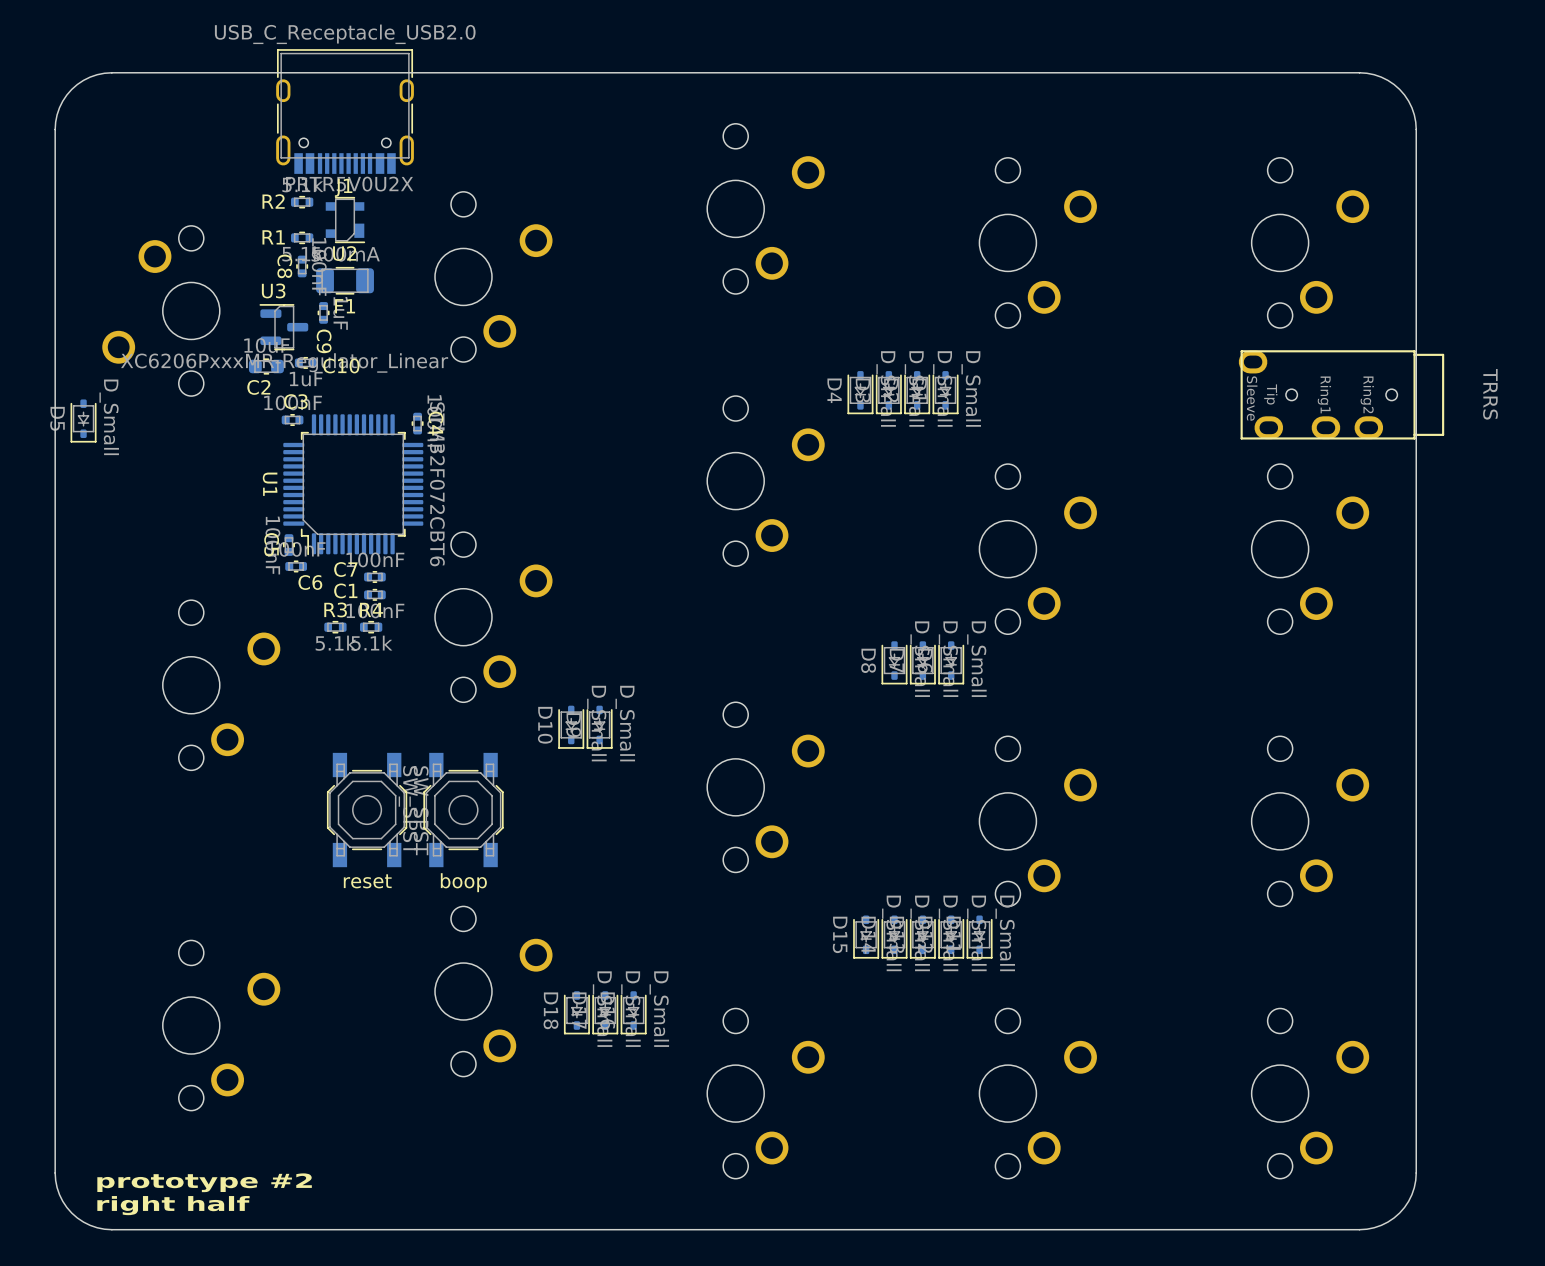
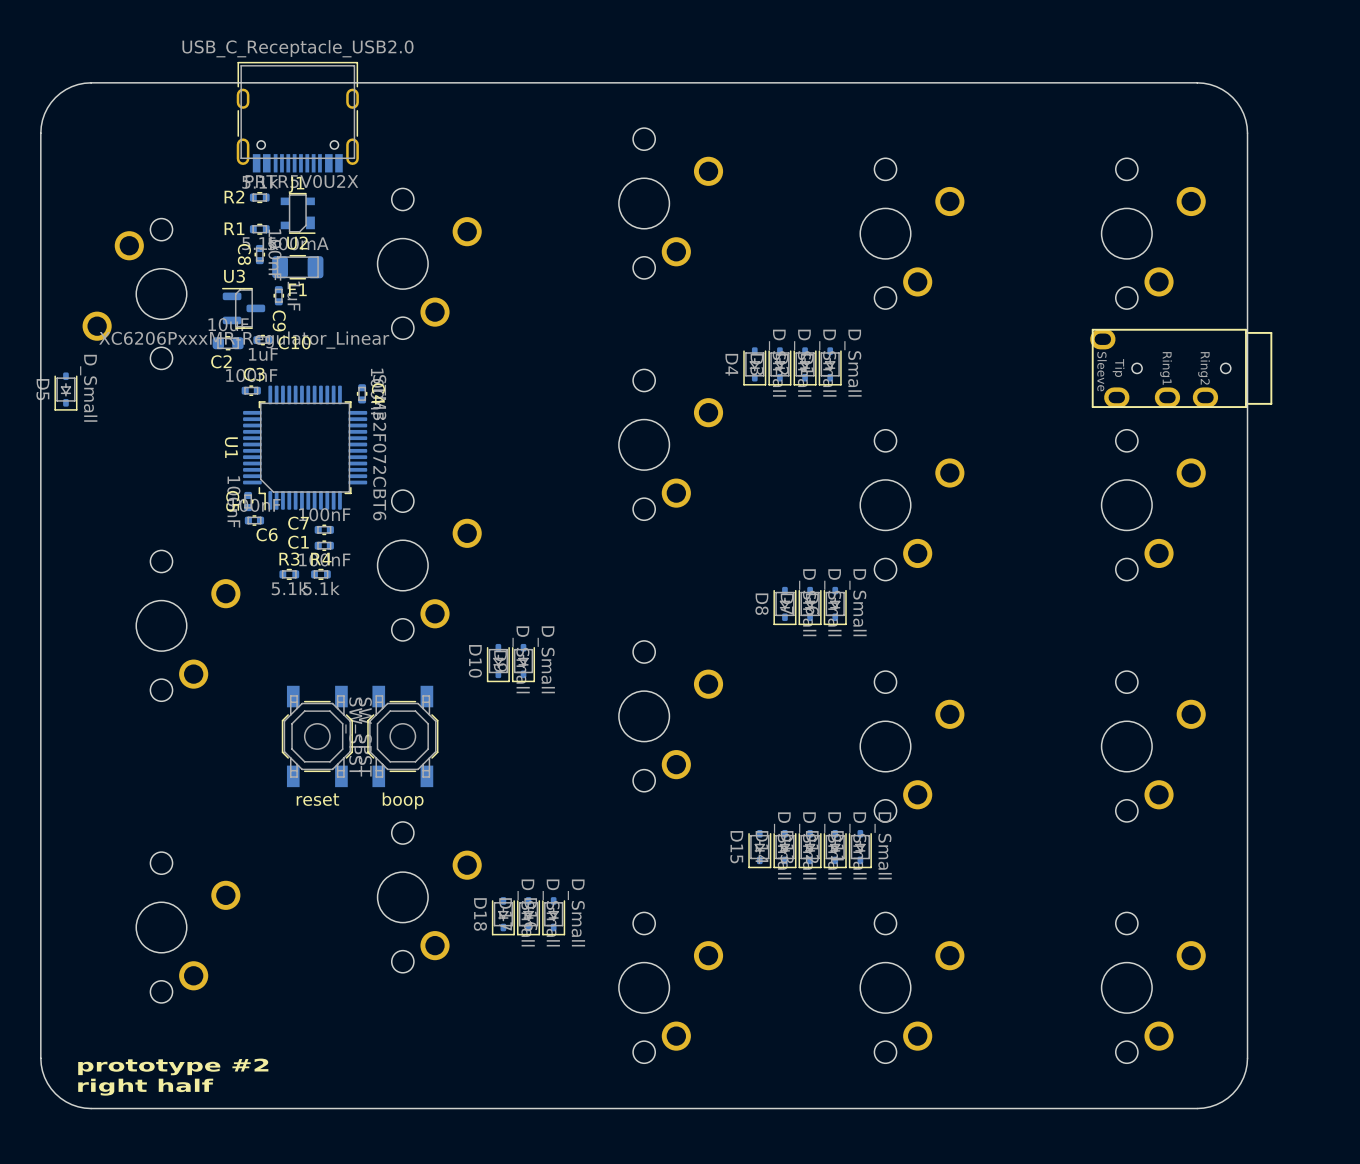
part value: TRRS (1490, 394) -> none

